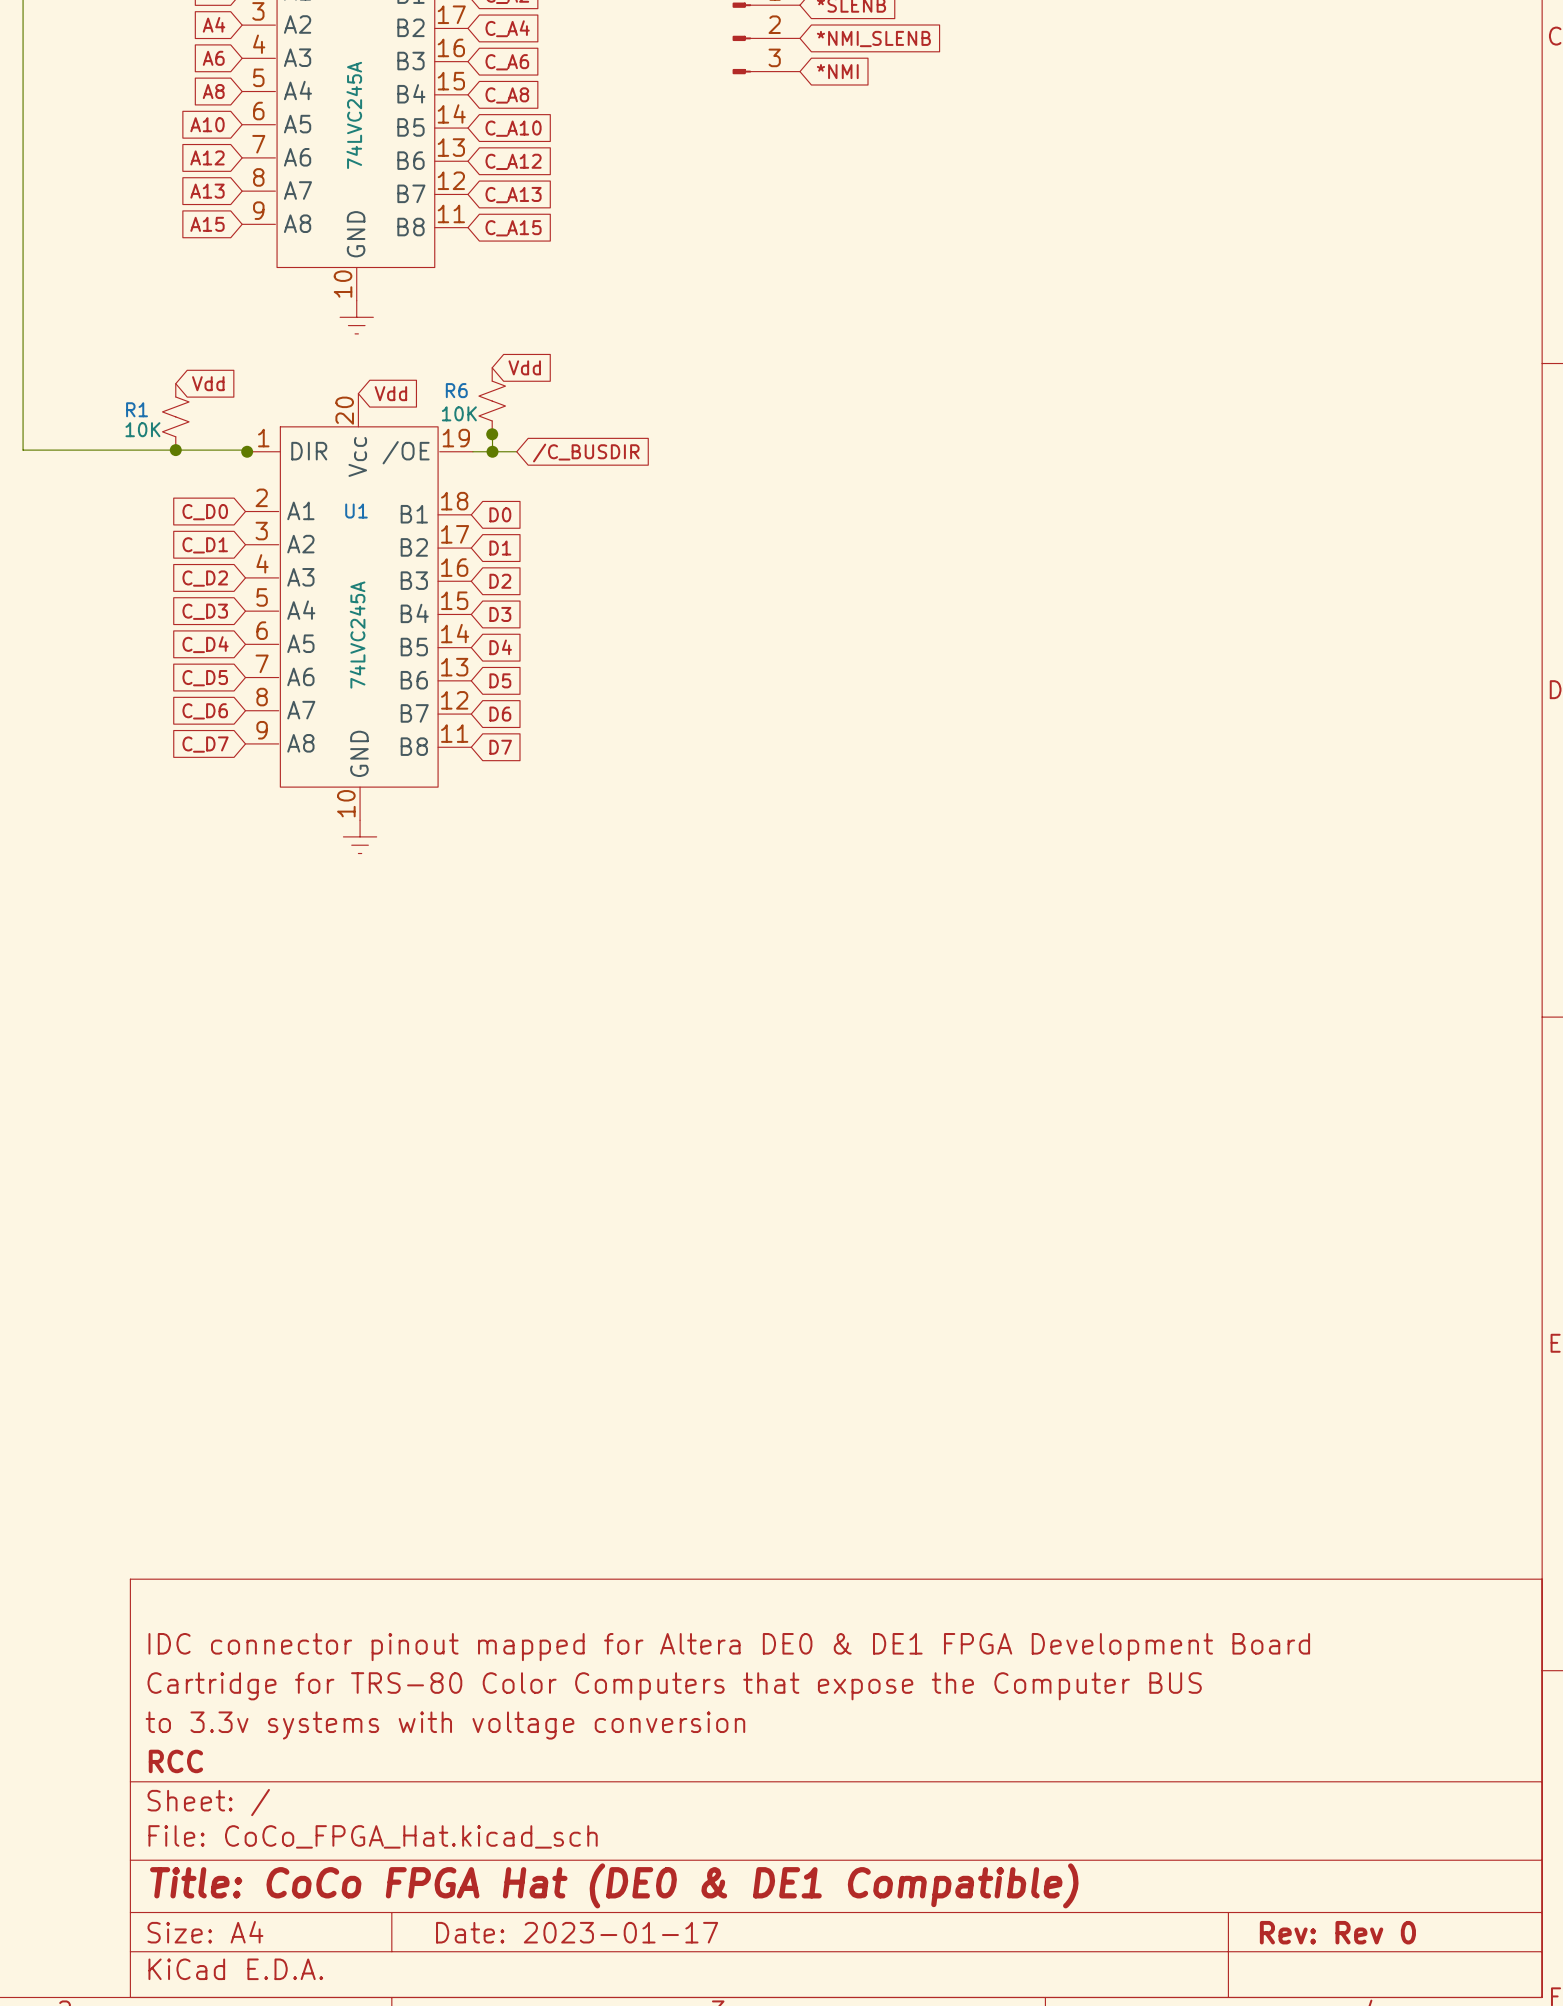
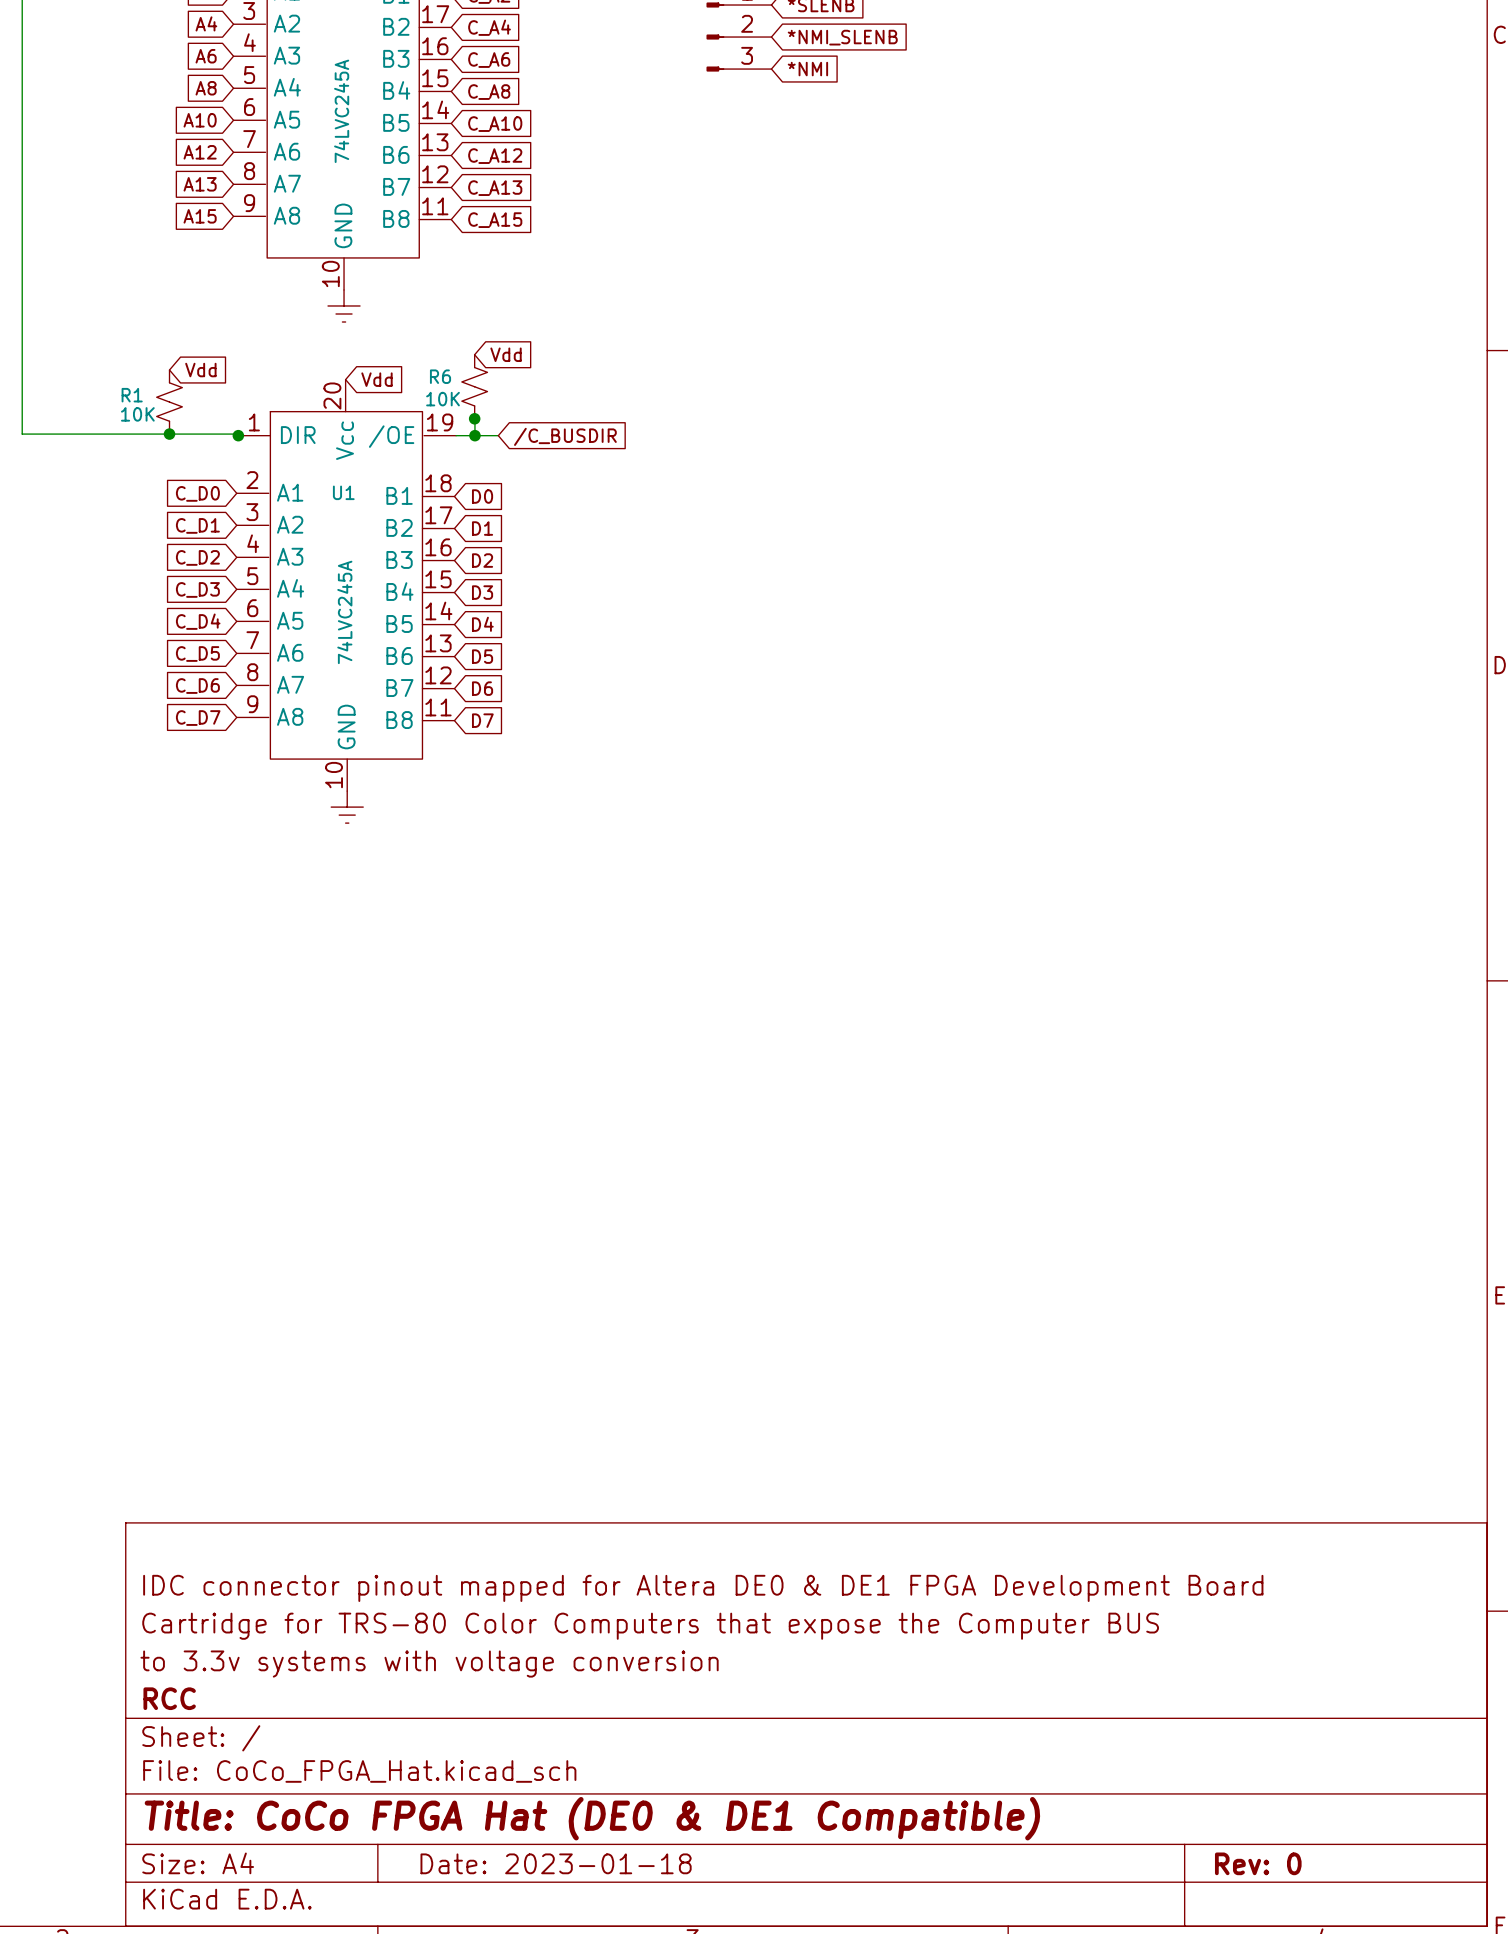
title block: Date: 2023-01-17 (577, 1932) -> Date: 2023-01-18 (556, 1863)
title block: Rev: Rev 0 (1337, 1932) -> Rev: 0 (1258, 1863)

